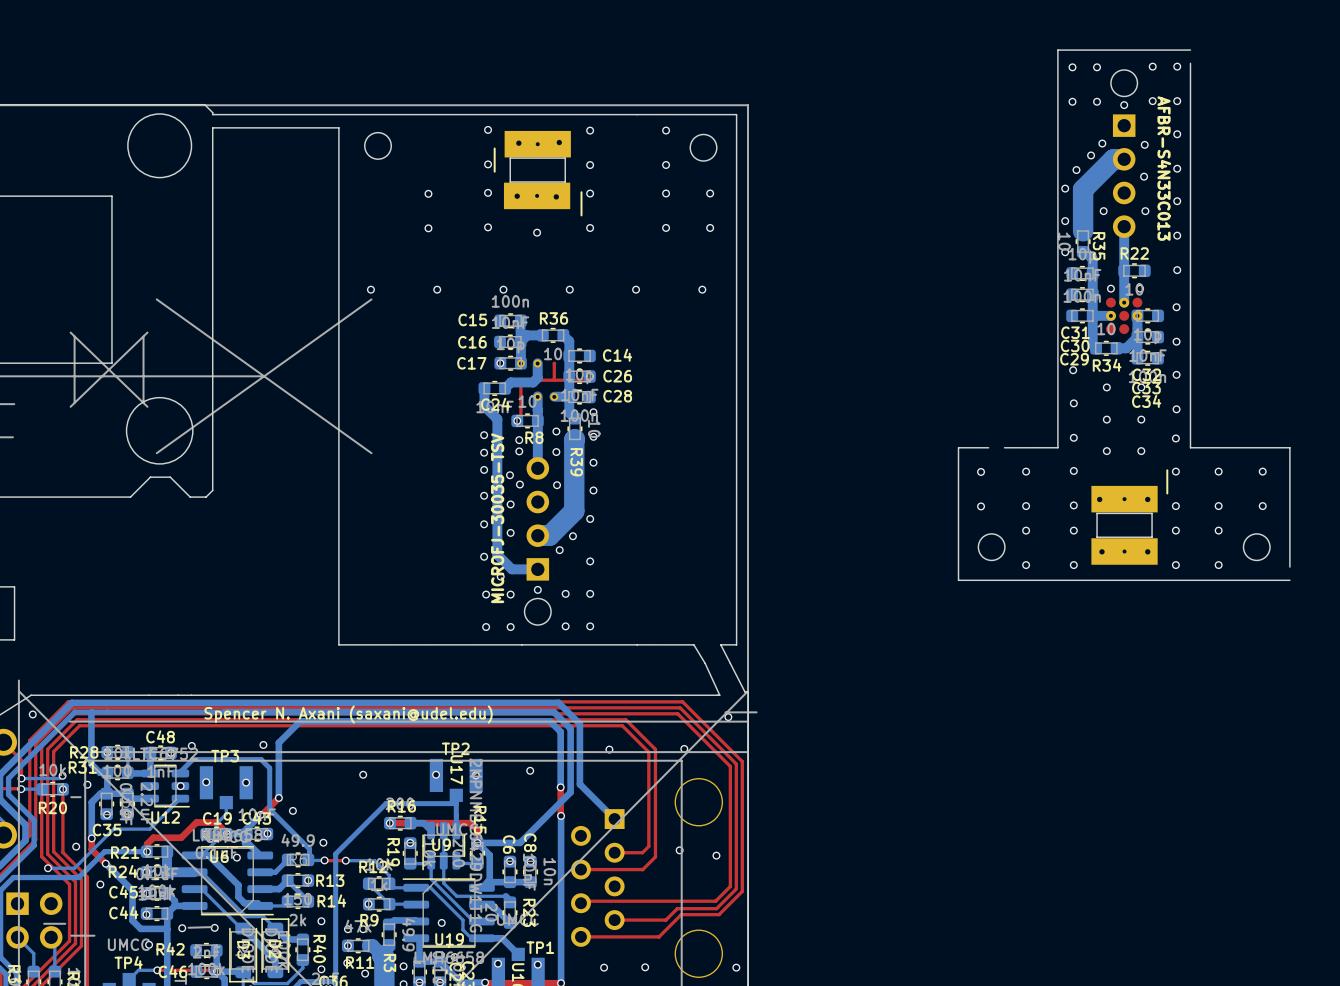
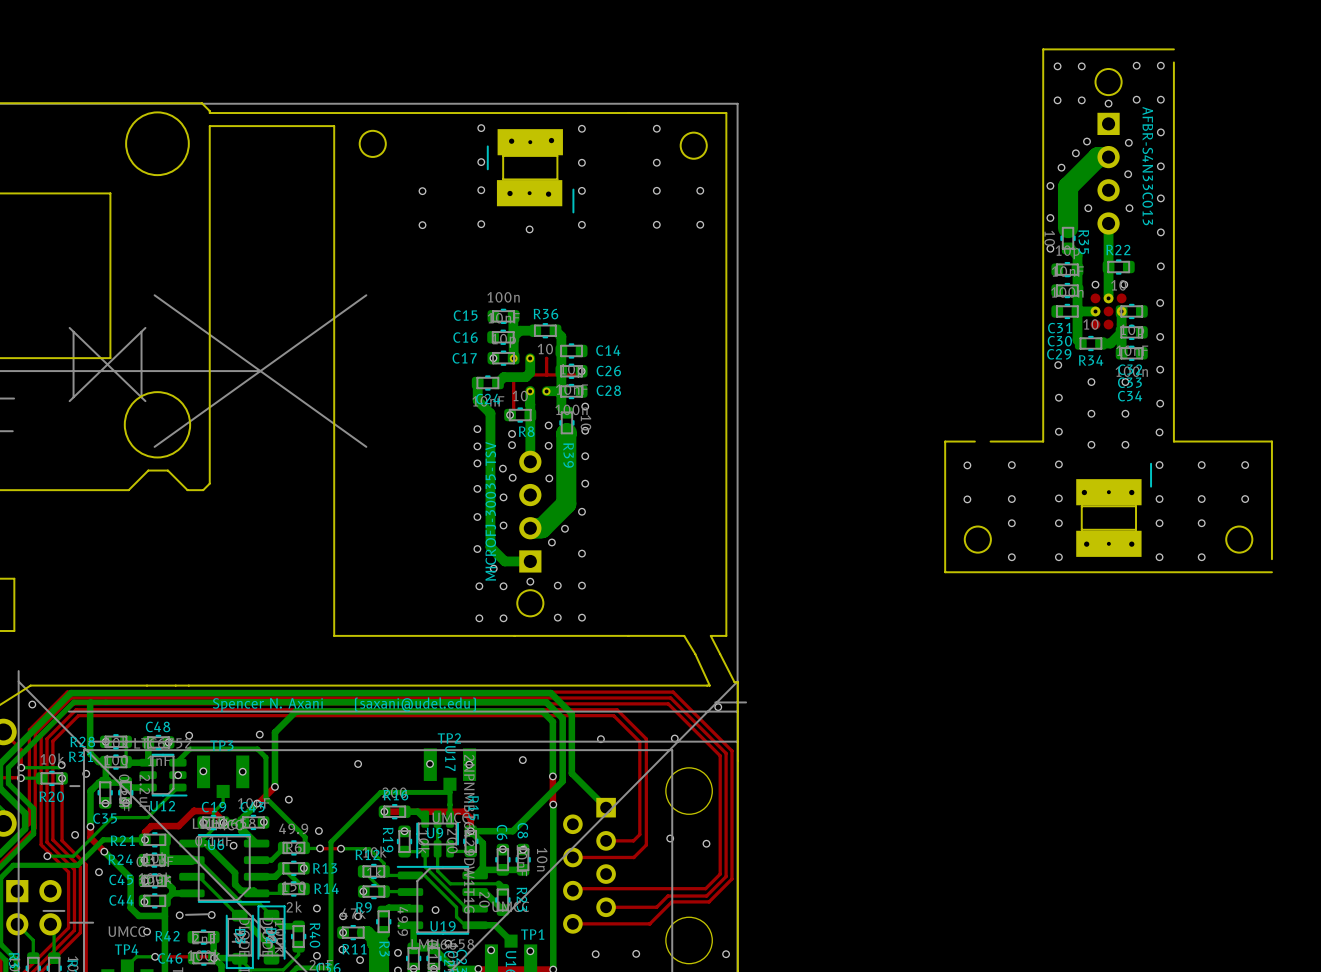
via: (370, 289) -> none
via: (437, 289) -> none
via: (503, 289) -> none
via: (569, 289) -> none
via: (636, 289) -> none
via: (702, 289) -> none

